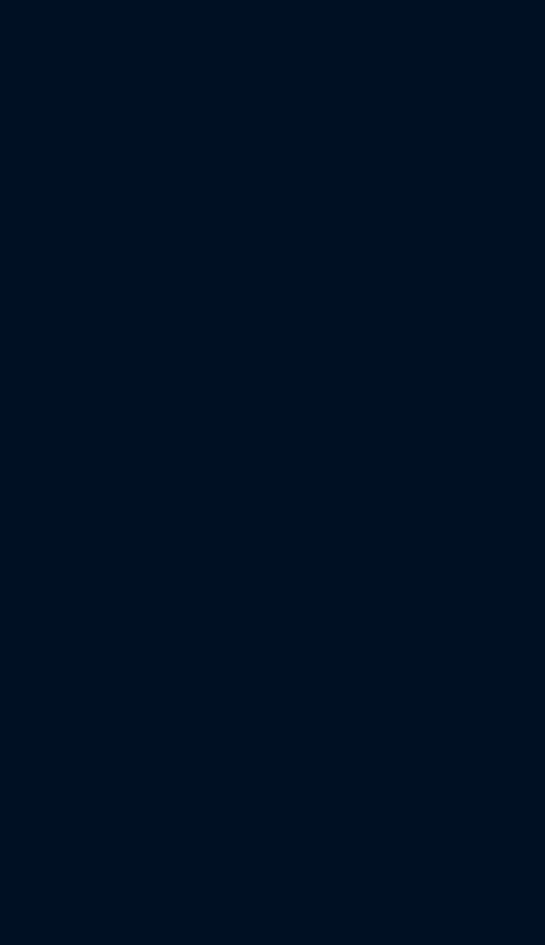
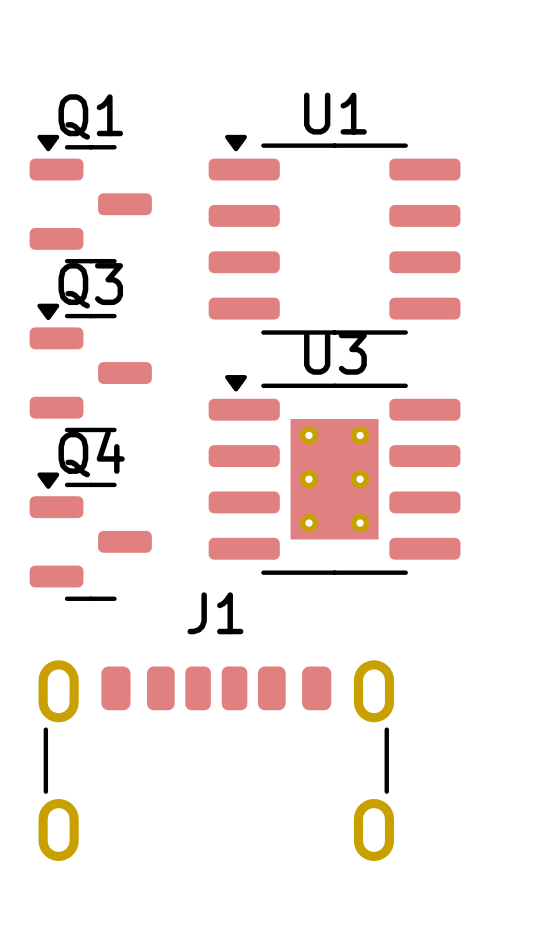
Q1: none -> (90, 199)
U1: none -> (334, 234)
Q3: none -> (90, 367)
U3: none -> (334, 474)
Q4: none -> (90, 536)
J1: none -> (216, 760)

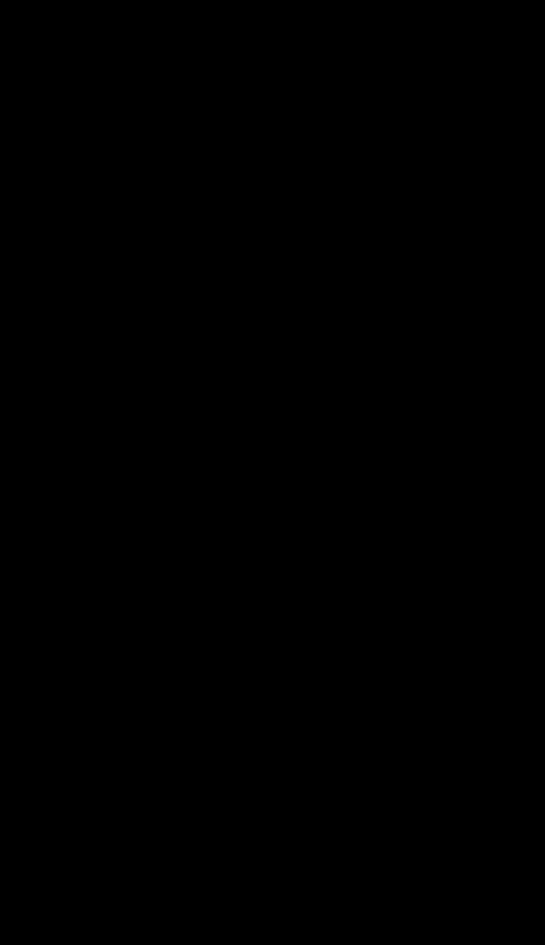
Q1: (90, 199) -> none
U1: (334, 234) -> none
Q3: (90, 367) -> none
U3: (334, 474) -> none
Q4: (90, 536) -> none
J1: (216, 760) -> none

